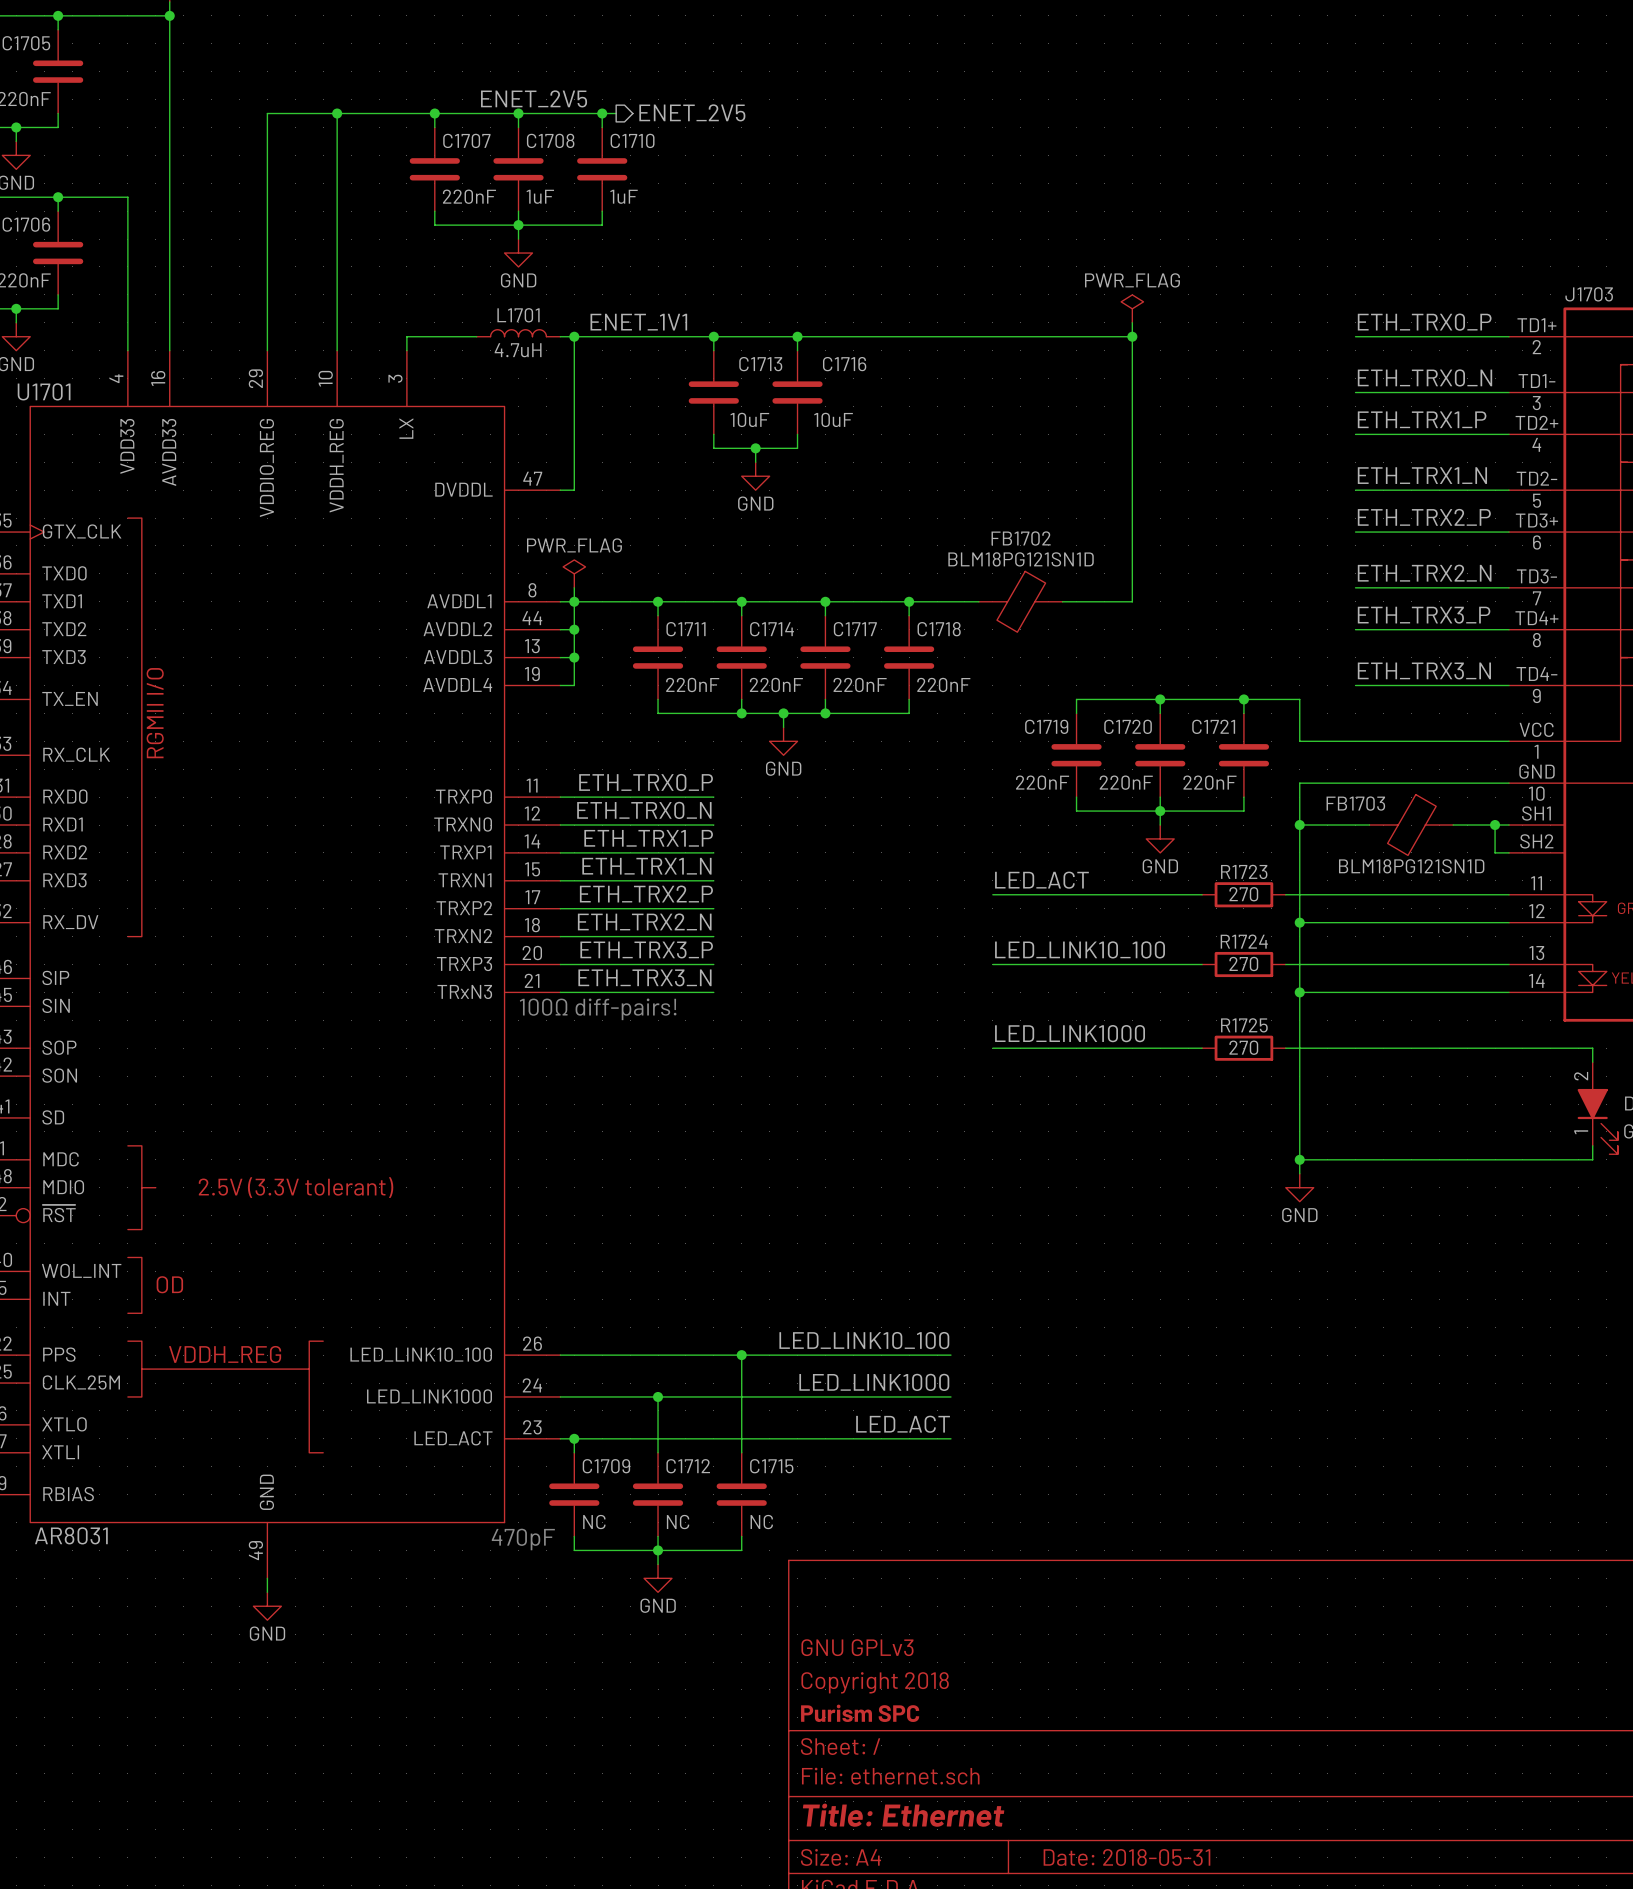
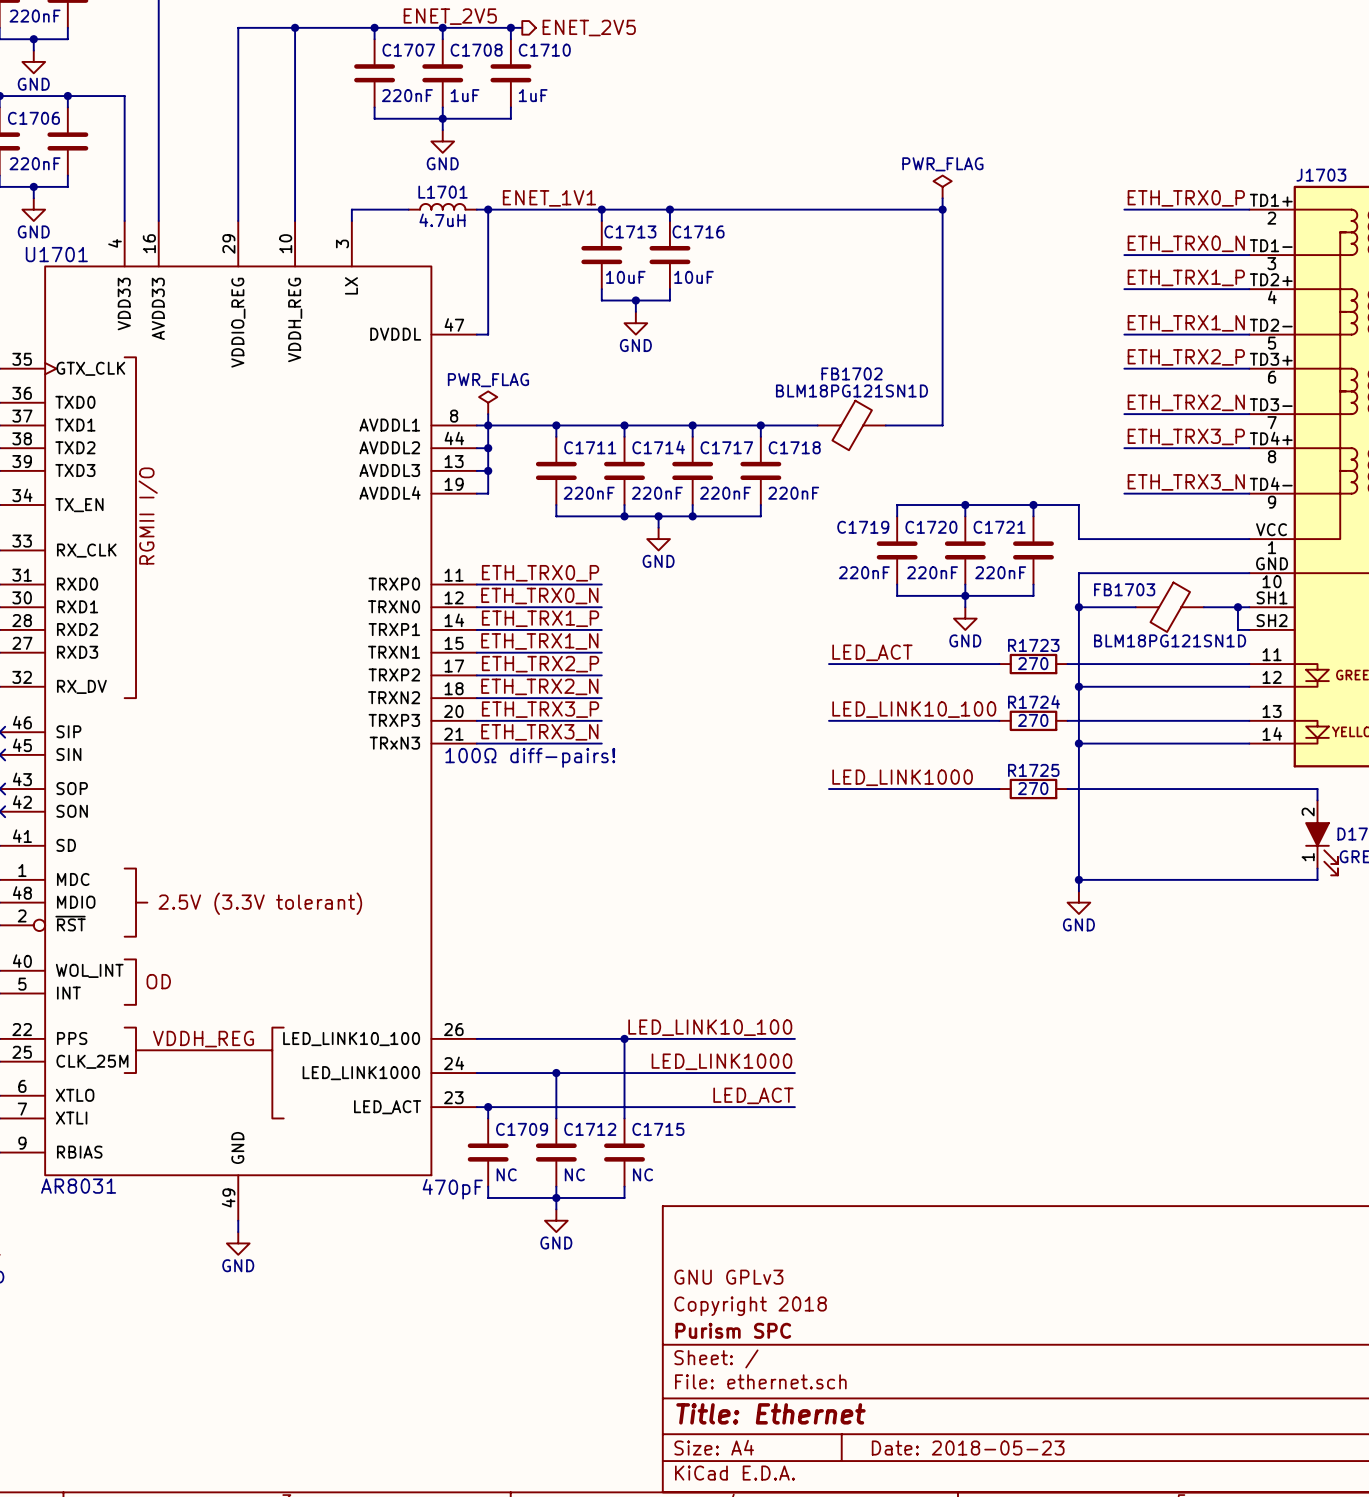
title block: Date: 2018-05-31 (1126, 1857) -> Date: 2018-05-23 (968, 1448)

